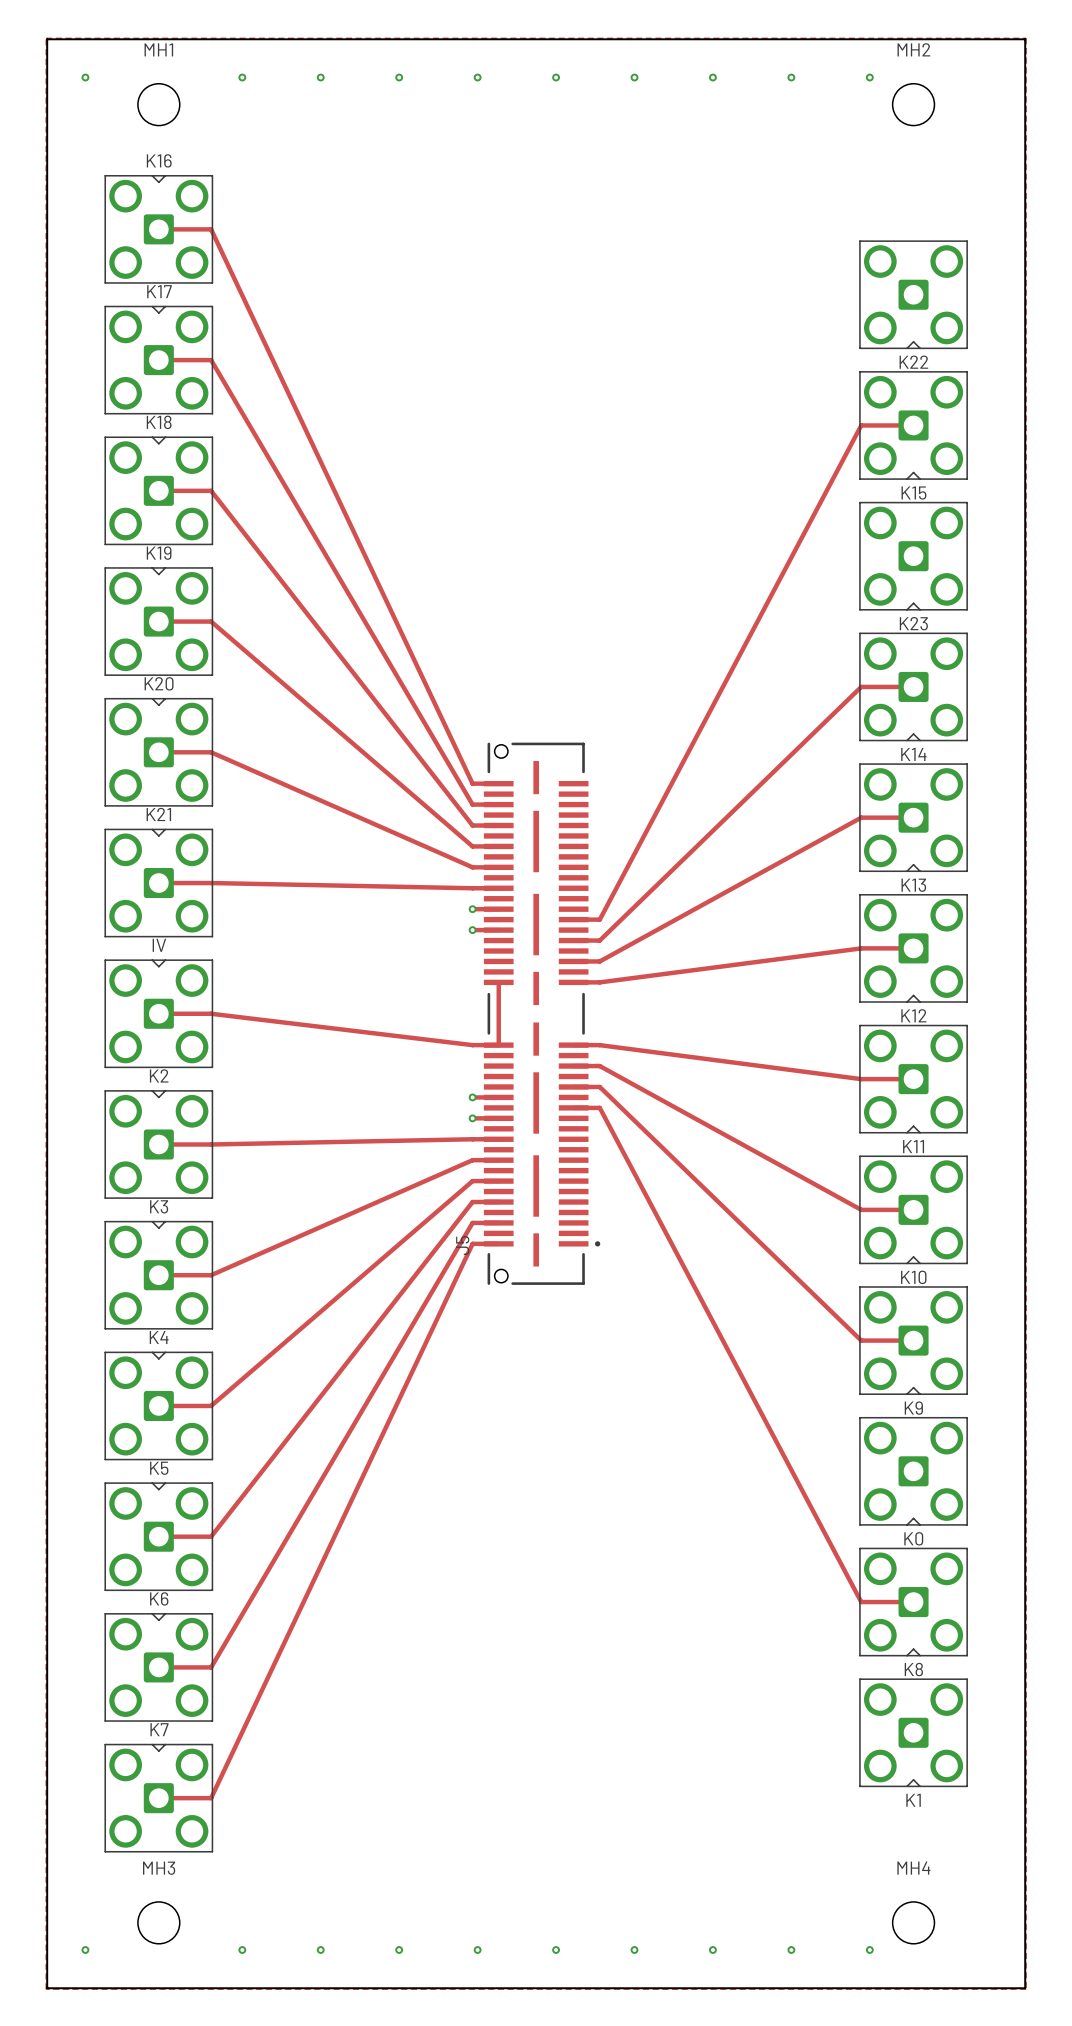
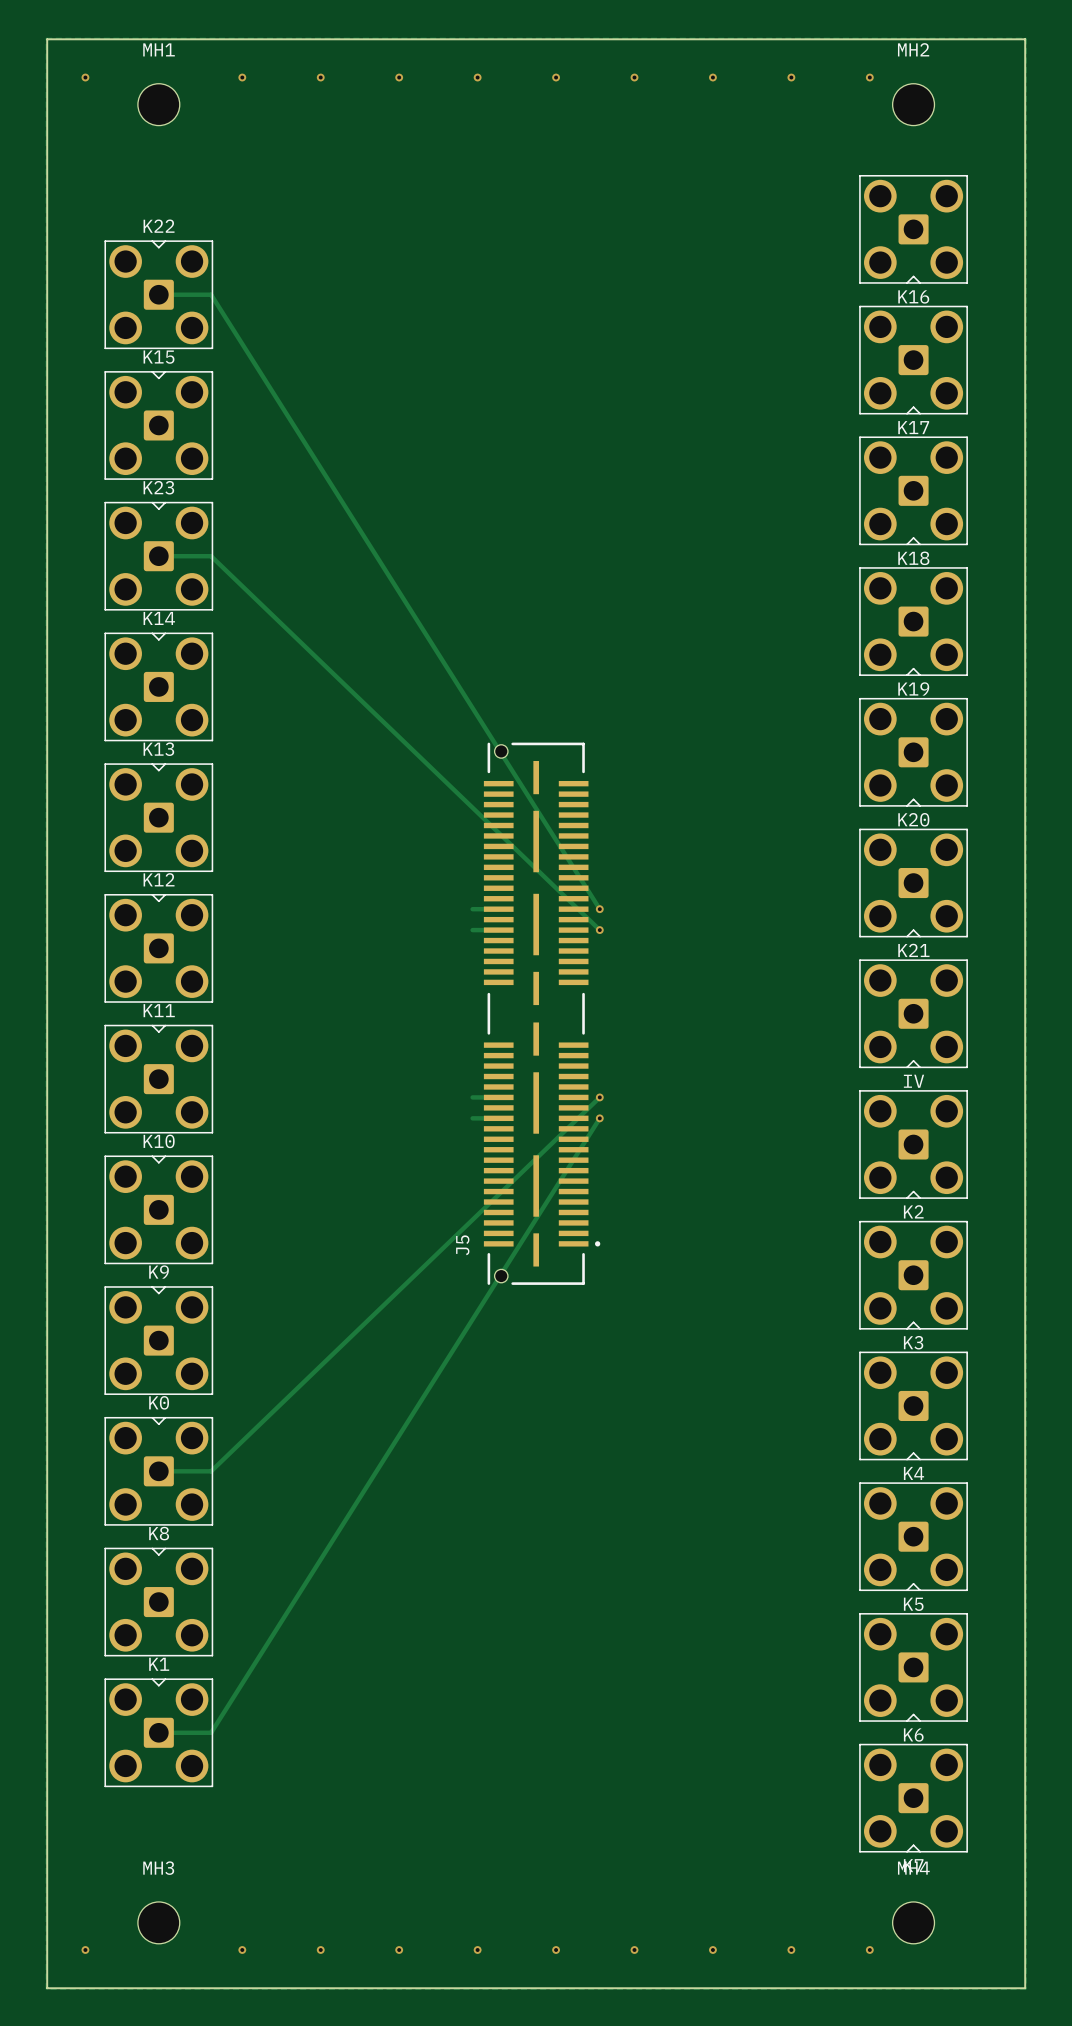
track: (158, 229) (211, 229) (472, 783) (498, 783) -> none
K16 rotation: 0° (158, 229) -> 180° (913, 229)
K16 position: (158, 229) -> (913, 229)
track: none -> (158, 294) (211, 294) (599, 909)
K22 rotation: 0° (913, 294) -> 180° (158, 294)
K22 position: (913, 294) -> (158, 294)
track: (158, 360) (211, 360) (472, 804) (498, 804) -> none
K17 rotation: 0° (158, 360) -> 180° (913, 360)
K17 position: (158, 360) -> (913, 360)
track: (913, 425) (861, 425) (599, 919) (573, 919) -> none
K15 rotation: 0° (913, 425) -> 180° (158, 425)
K15 position: (913, 425) -> (158, 425)
track: (158, 490) (211, 490) (472, 825) (498, 825) -> none
K18 rotation: 0° (158, 490) -> 180° (913, 490)
K18 position: (158, 490) -> (913, 490)
track: none -> (158, 556) (211, 556) (599, 930)
K23 rotation: 0° (913, 556) -> 180° (158, 556)
K23 position: (913, 556) -> (158, 556)
track: (158, 621) (211, 621) (472, 846) (498, 846) -> none
K19 rotation: 0° (158, 621) -> 180° (913, 621)
K19 position: (158, 621) -> (913, 621)
track: (913, 686) (861, 686) (599, 940) (573, 940) -> none
K14 rotation: 0° (913, 686) -> 180° (158, 686)
K14 position: (913, 686) -> (158, 686)
track: (158, 752) (211, 752) (472, 867) (498, 867) -> none
K20 rotation: 0° (158, 752) -> 180° (913, 752)
K20 position: (158, 752) -> (913, 752)
track: (913, 817) (861, 817) (599, 961) (573, 961) -> none
K13 rotation: 0° (913, 817) -> 180° (158, 817)
K13 position: (913, 817) -> (158, 817)
track: (158, 883) (498, 888) -> none
K21 rotation: 0° (158, 883) -> 180° (913, 883)
K21 position: (158, 883) -> (913, 883)
via: (472, 909) -> none
via: none -> (599, 909)
via: (472, 930) -> none
via: none -> (599, 930)
track: (913, 948) (861, 948) (599, 982) (573, 982) -> none
K12 rotation: 0° (913, 948) -> 180° (158, 948)
K12 position: (913, 948) -> (158, 948)
track: (498, 982) (498, 1045) (472, 1045) (211, 1013) (158, 1013) -> none
IV: (158, 1013) -> none
IV: none -> (913, 1013)
track: (573, 1045) (599, 1045) (861, 1079) (913, 1079) -> none
track: (573, 1066) (599, 1066) (861, 1209) (913, 1209) -> none
K11 rotation: 0° (913, 1079) -> 180° (158, 1079)
K11 position: (913, 1079) -> (158, 1079)
track: (573, 1086) (599, 1086) (861, 1340) (913, 1340) -> none
via: (472, 1097) -> none
track: none -> (599, 1097) (211, 1471) (158, 1471)
via: none -> (599, 1097)
track: (573, 1107) (599, 1107) (861, 1602) (913, 1602) -> none
via: (472, 1118) -> none
track: none -> (599, 1118) (211, 1732) (158, 1732)
via: none -> (599, 1118)
track: (498, 1139) (158, 1144) -> none
K2 rotation: 0° (158, 1144) -> 180° (913, 1144)
K2 position: (158, 1144) -> (913, 1144)
track: (498, 1160) (472, 1160) (211, 1275) (158, 1275) -> none
track: (498, 1181) (472, 1181) (211, 1405) (158, 1405) -> none
track: (498, 1202) (472, 1202) (211, 1536) (158, 1536) -> none
K10 rotation: 0° (913, 1209) -> 180° (158, 1209)
K10 position: (913, 1209) -> (158, 1209)
track: (498, 1222) (472, 1222) (211, 1667) (158, 1667) -> none
track: (498, 1243) (472, 1243) (211, 1798) (158, 1798) -> none
K3 rotation: 0° (158, 1275) -> 180° (913, 1275)
K3 position: (158, 1275) -> (913, 1275)
K9 rotation: 0° (913, 1340) -> 180° (158, 1340)
K9 position: (913, 1340) -> (158, 1340)
K4 rotation: 0° (158, 1405) -> 180° (913, 1405)
K4 position: (158, 1405) -> (913, 1405)
K0 rotation: 0° (913, 1471) -> 180° (158, 1471)
K0 position: (913, 1471) -> (158, 1471)
K5 rotation: 0° (158, 1536) -> 180° (913, 1536)
K5 position: (158, 1536) -> (913, 1536)
K8 rotation: 0° (913, 1602) -> 180° (158, 1602)
K8 position: (913, 1602) -> (158, 1602)
K6 rotation: 0° (158, 1667) -> 180° (913, 1667)
K6 position: (158, 1667) -> (913, 1667)
K1 rotation: 0° (913, 1732) -> 180° (158, 1732)
K1 position: (913, 1732) -> (158, 1732)
K7 rotation: 0° (158, 1798) -> 180° (913, 1798)
K7 position: (158, 1798) -> (913, 1798)

